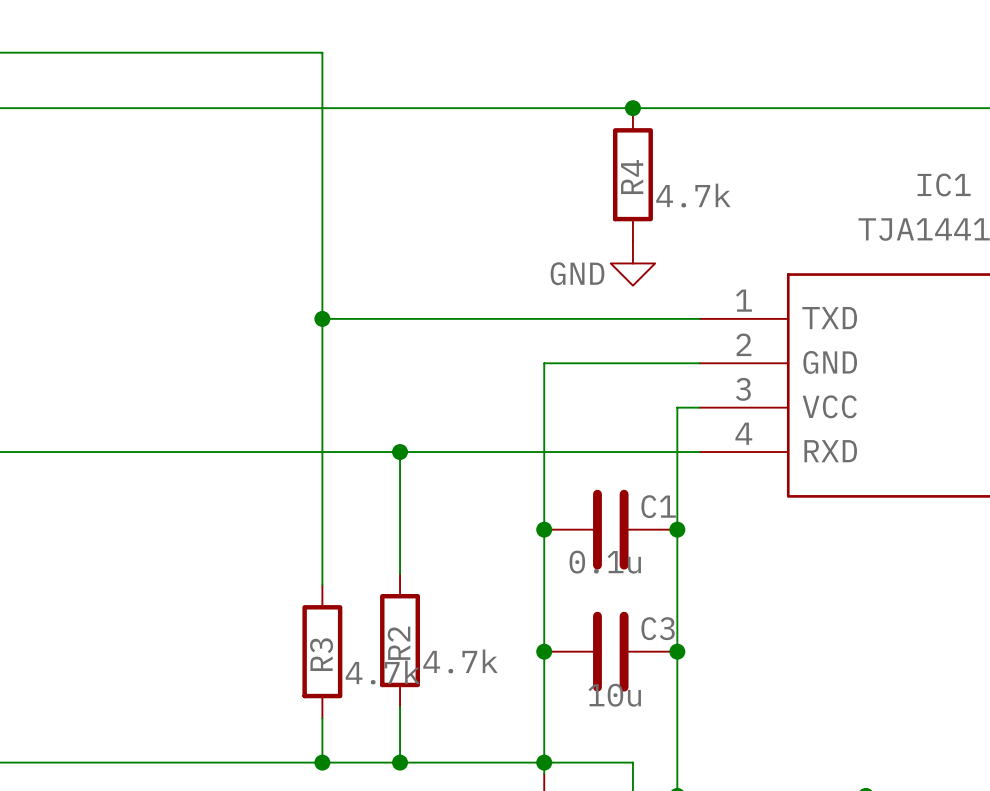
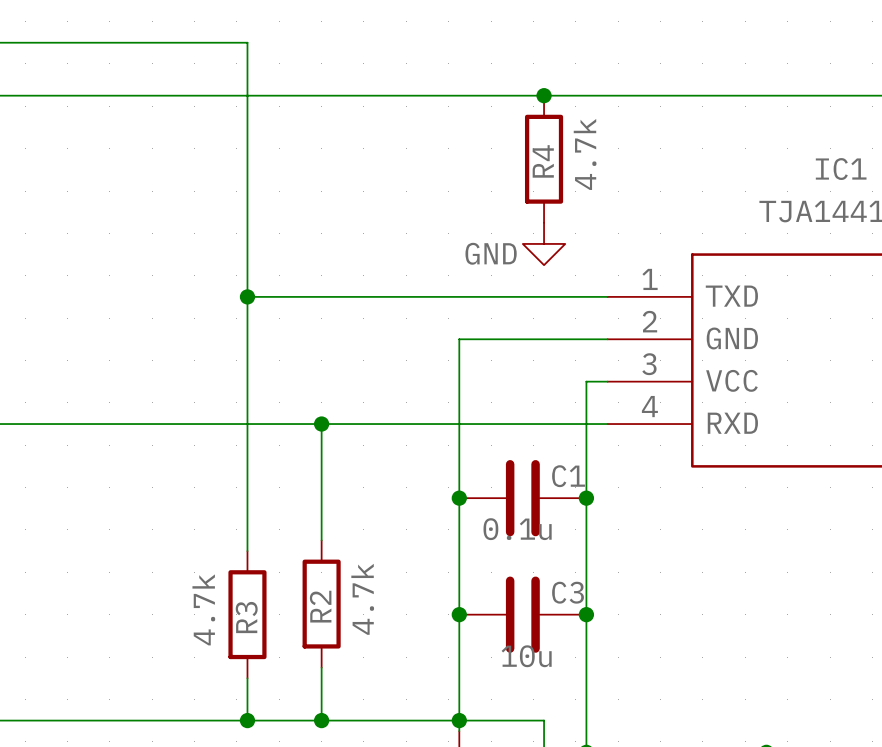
R4 value rotation: 0° (693, 195) -> 90° counterclockwise (585, 154)
R2 value rotation: 0° (460, 661) -> 90° counterclockwise (362, 599)
R3 value rotation: 0° (382, 672) -> 90° counterclockwise (203, 609)
R3 value position: 4.7k (382, 672) -> 4.7k (203, 609)

